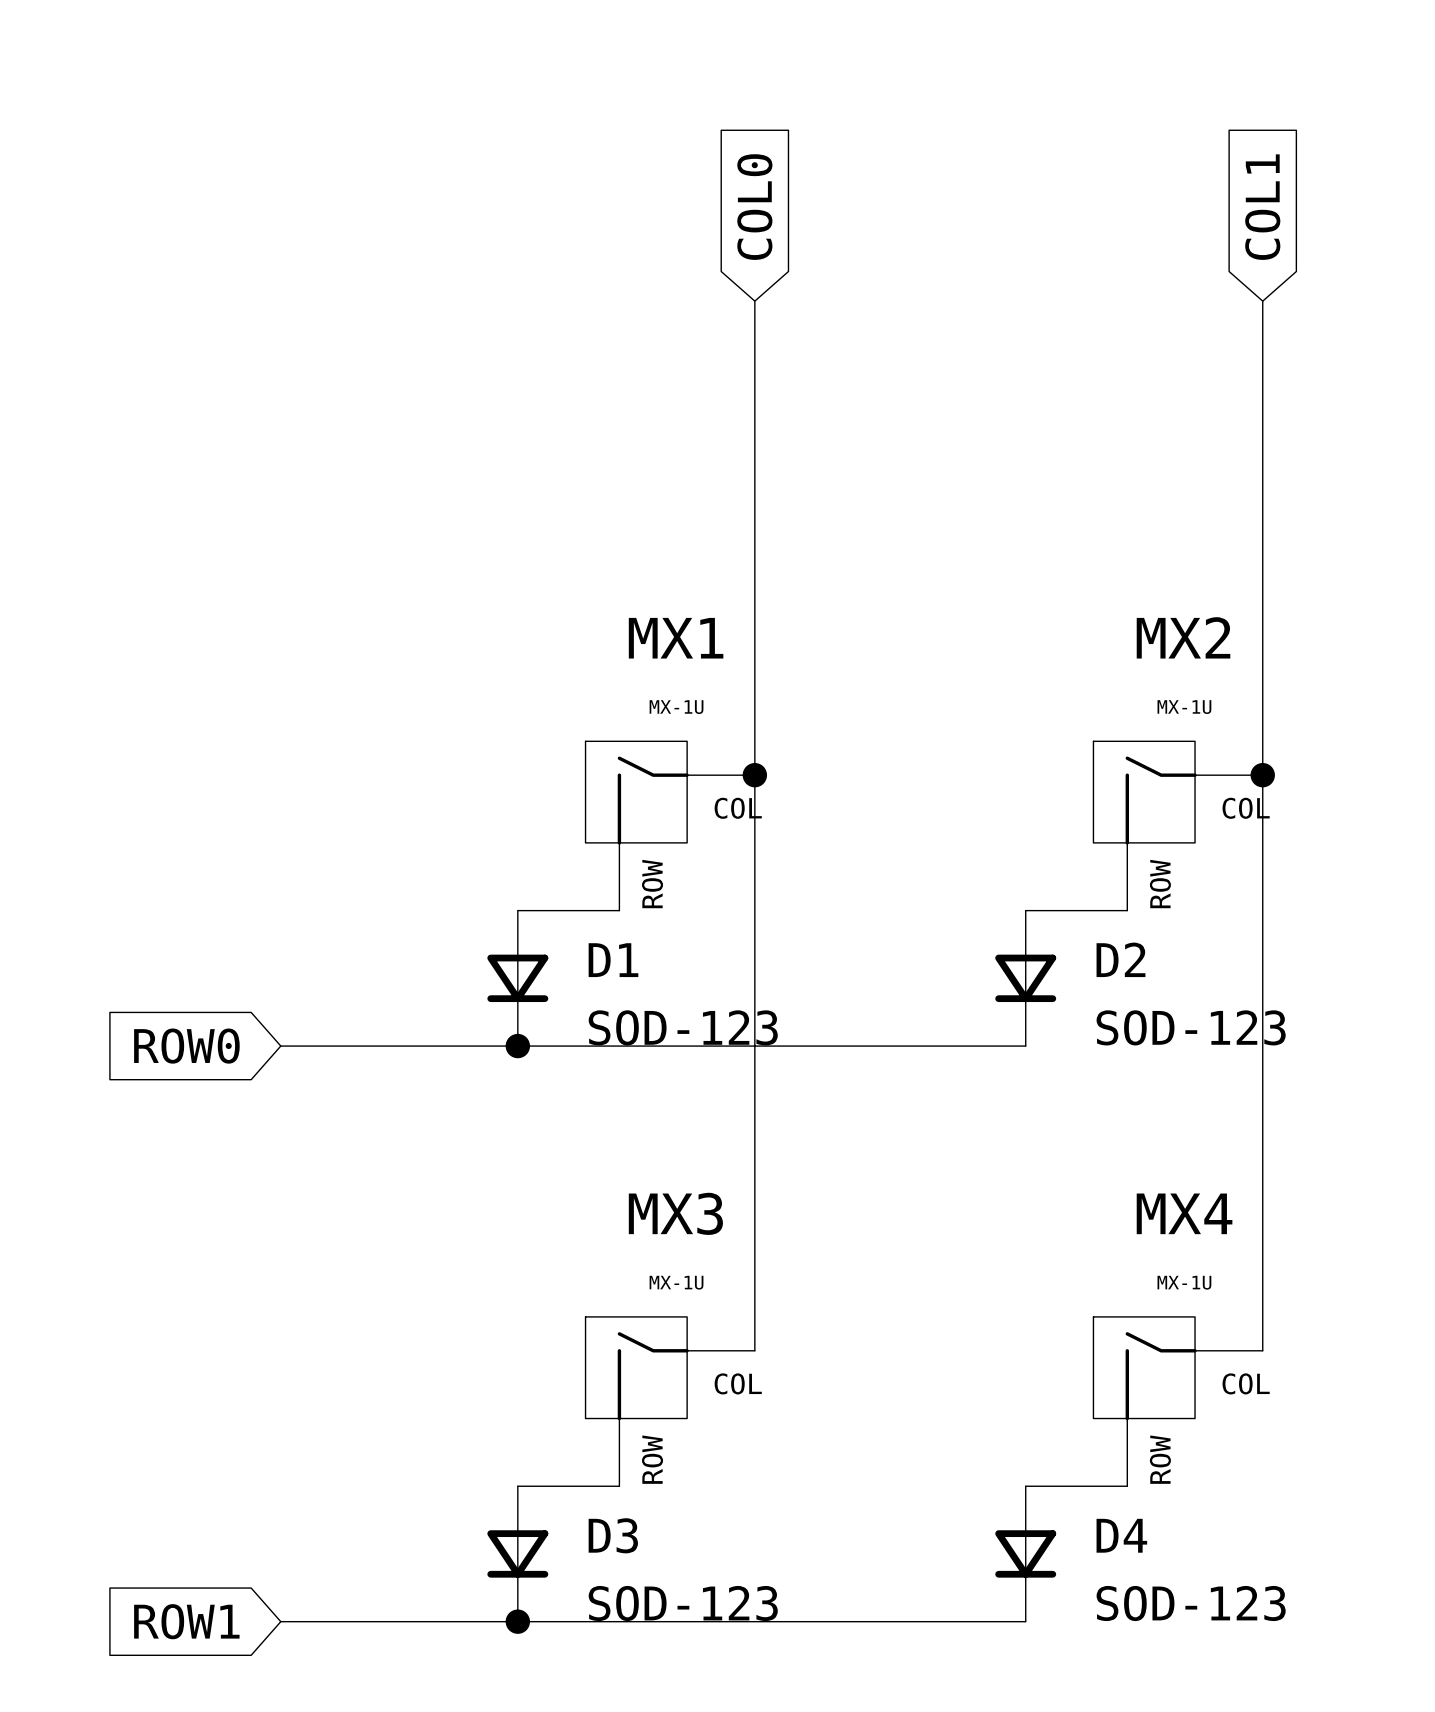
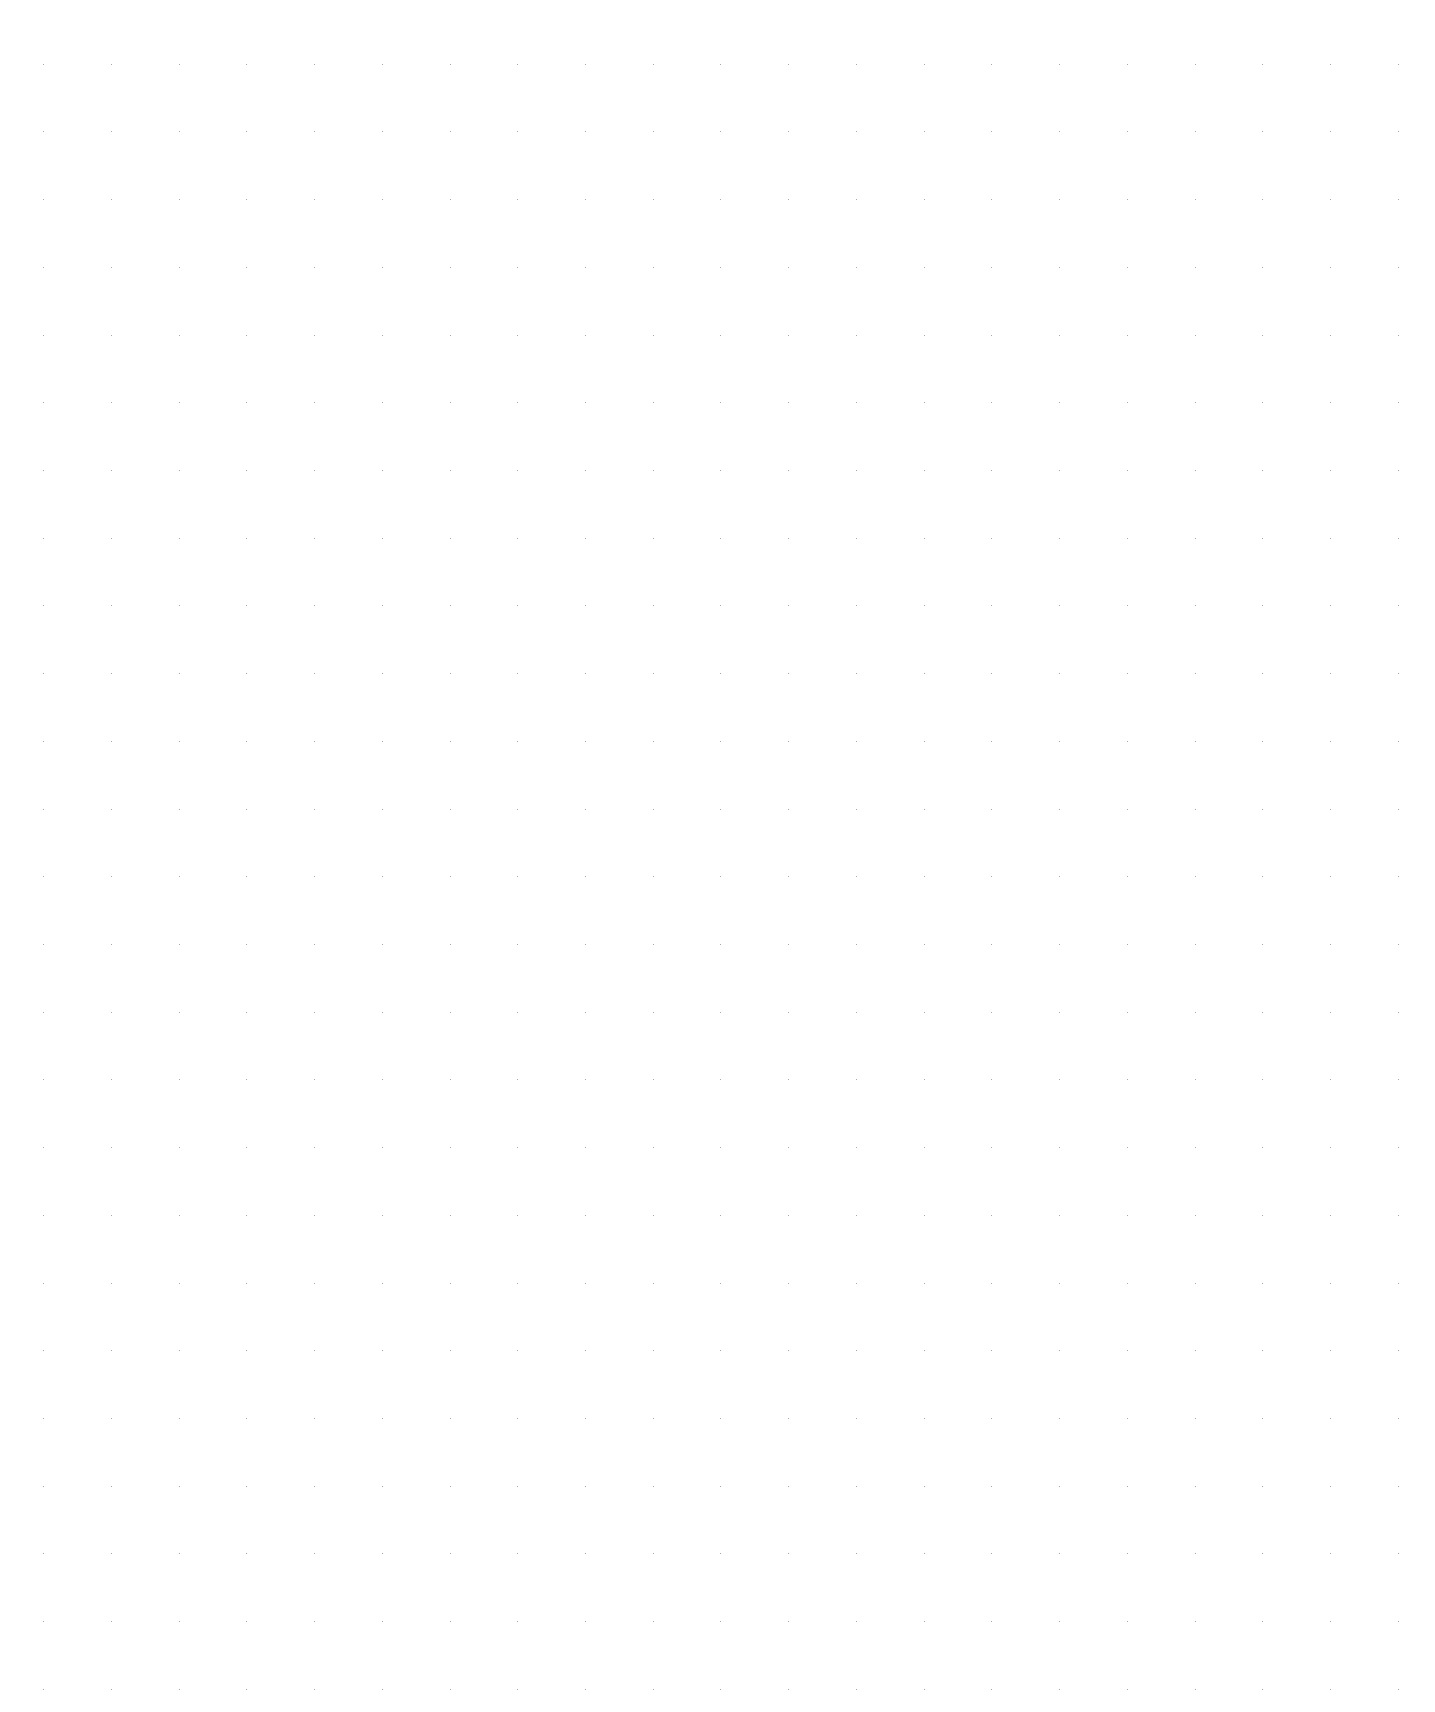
global label: COL0 (754, 207) -> none
global label: COL1 (1262, 207) -> none
wire: (754, 301) (754, 1350) -> none
wire: (1262, 301) (1262, 1350) -> none
junction: (754, 775) -> none
junction: (1262, 775) -> none
MX1: MX-1U (670, 825) -> none
MX2: MX-1U (1178, 825) -> none
wire: (517, 910) (619, 910) -> none
wire: (1025, 910) (1127, 910) -> none
D1: SOD-123 (517, 978) -> none
D2: SOD-123 (1025, 978) -> none
global label: ROW0 (186, 1046) -> none
wire: (280, 1046) (1025, 1046) -> none
junction: (517, 1046) -> none
MX3: MX-1U (670, 1401) -> none
MX4: MX-1U (1178, 1401) -> none
wire: (517, 1486) (619, 1486) -> none
wire: (1025, 1486) (1127, 1486) -> none
D3: SOD-123 (517, 1553) -> none
D4: SOD-123 (1025, 1553) -> none
global label: ROW1 (186, 1621) -> none
wire: (280, 1621) (1025, 1621) -> none
junction: (517, 1621) -> none

